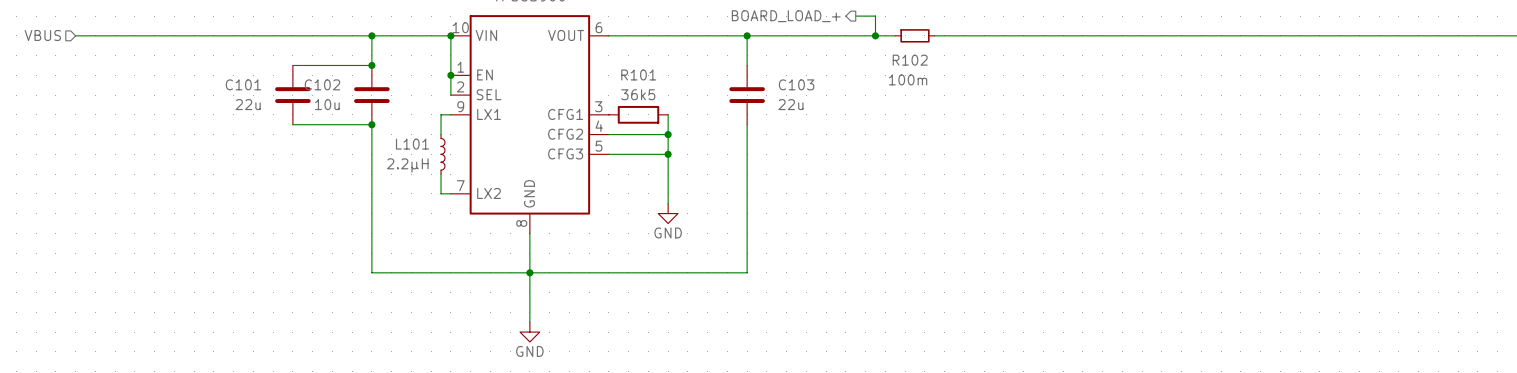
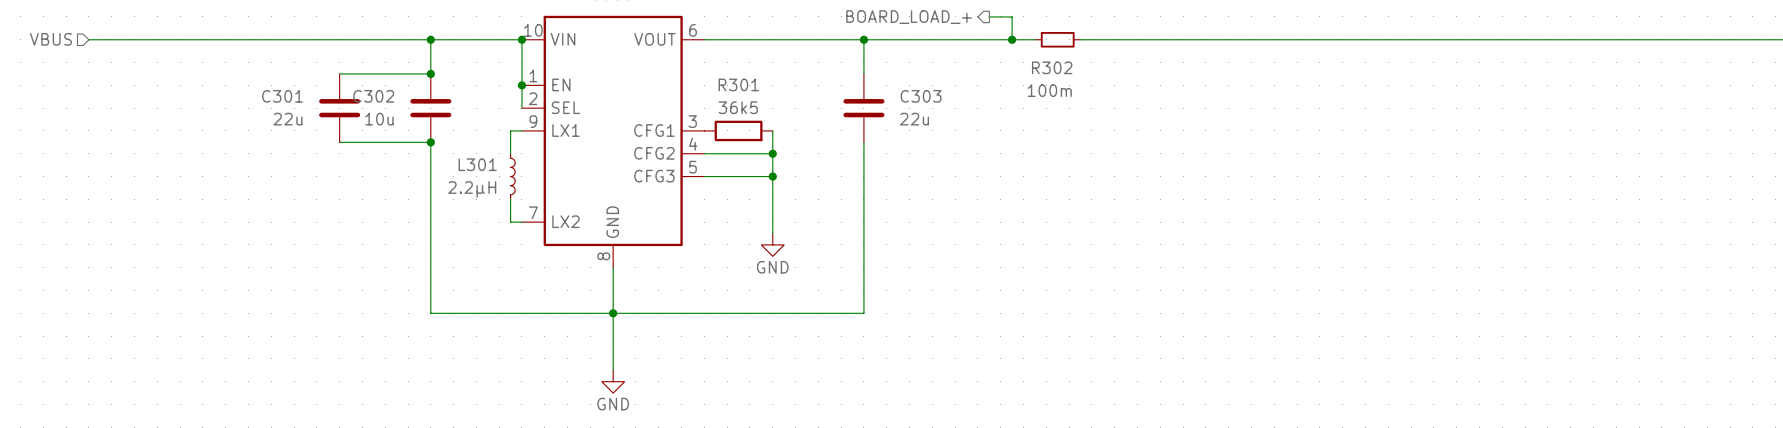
R102 name: R102 (910, 60) -> R302 (1052, 67)
R101 name: R101 (638, 74) -> R301 (738, 84)
C101 name: C101 (243, 84) -> C301 (282, 96)
C102 name: C102 (322, 84) -> C302 (373, 96)
C103 name: C103 (796, 84) -> C303 (921, 96)
L101 name: L101 (412, 144) -> L301 (477, 164)

